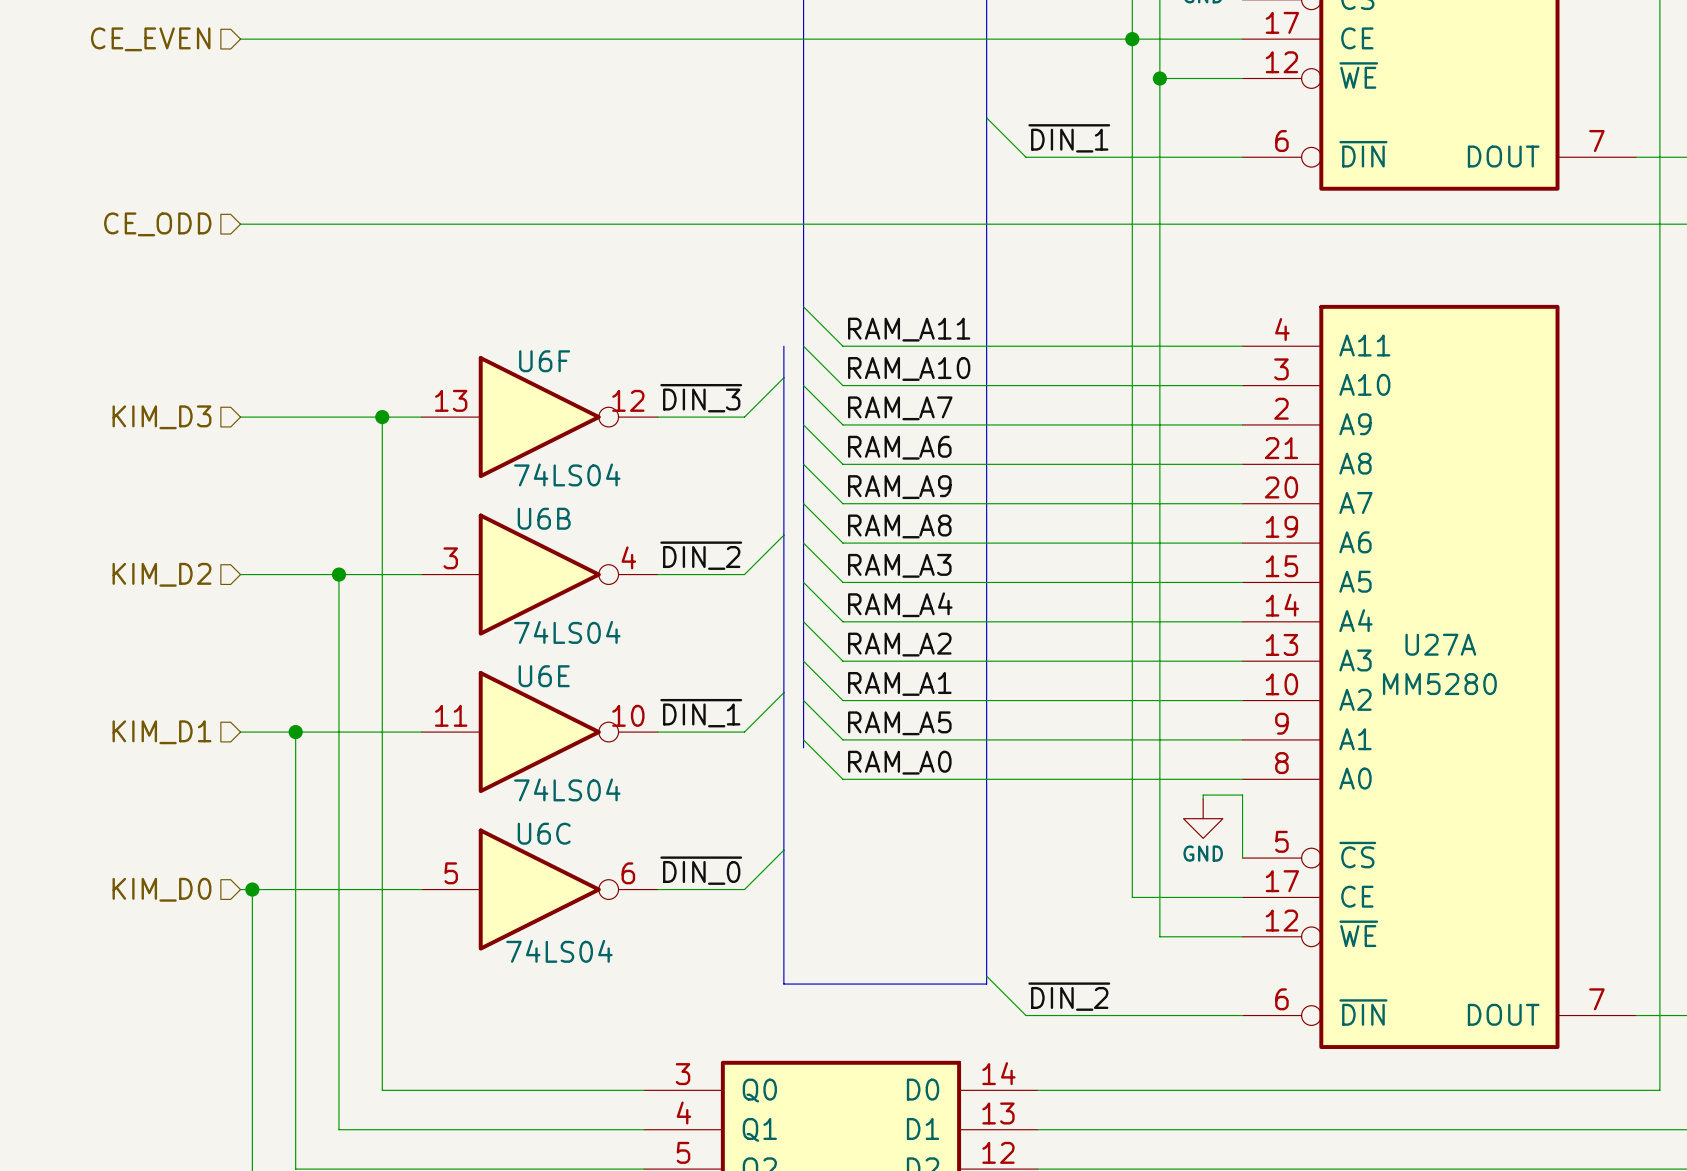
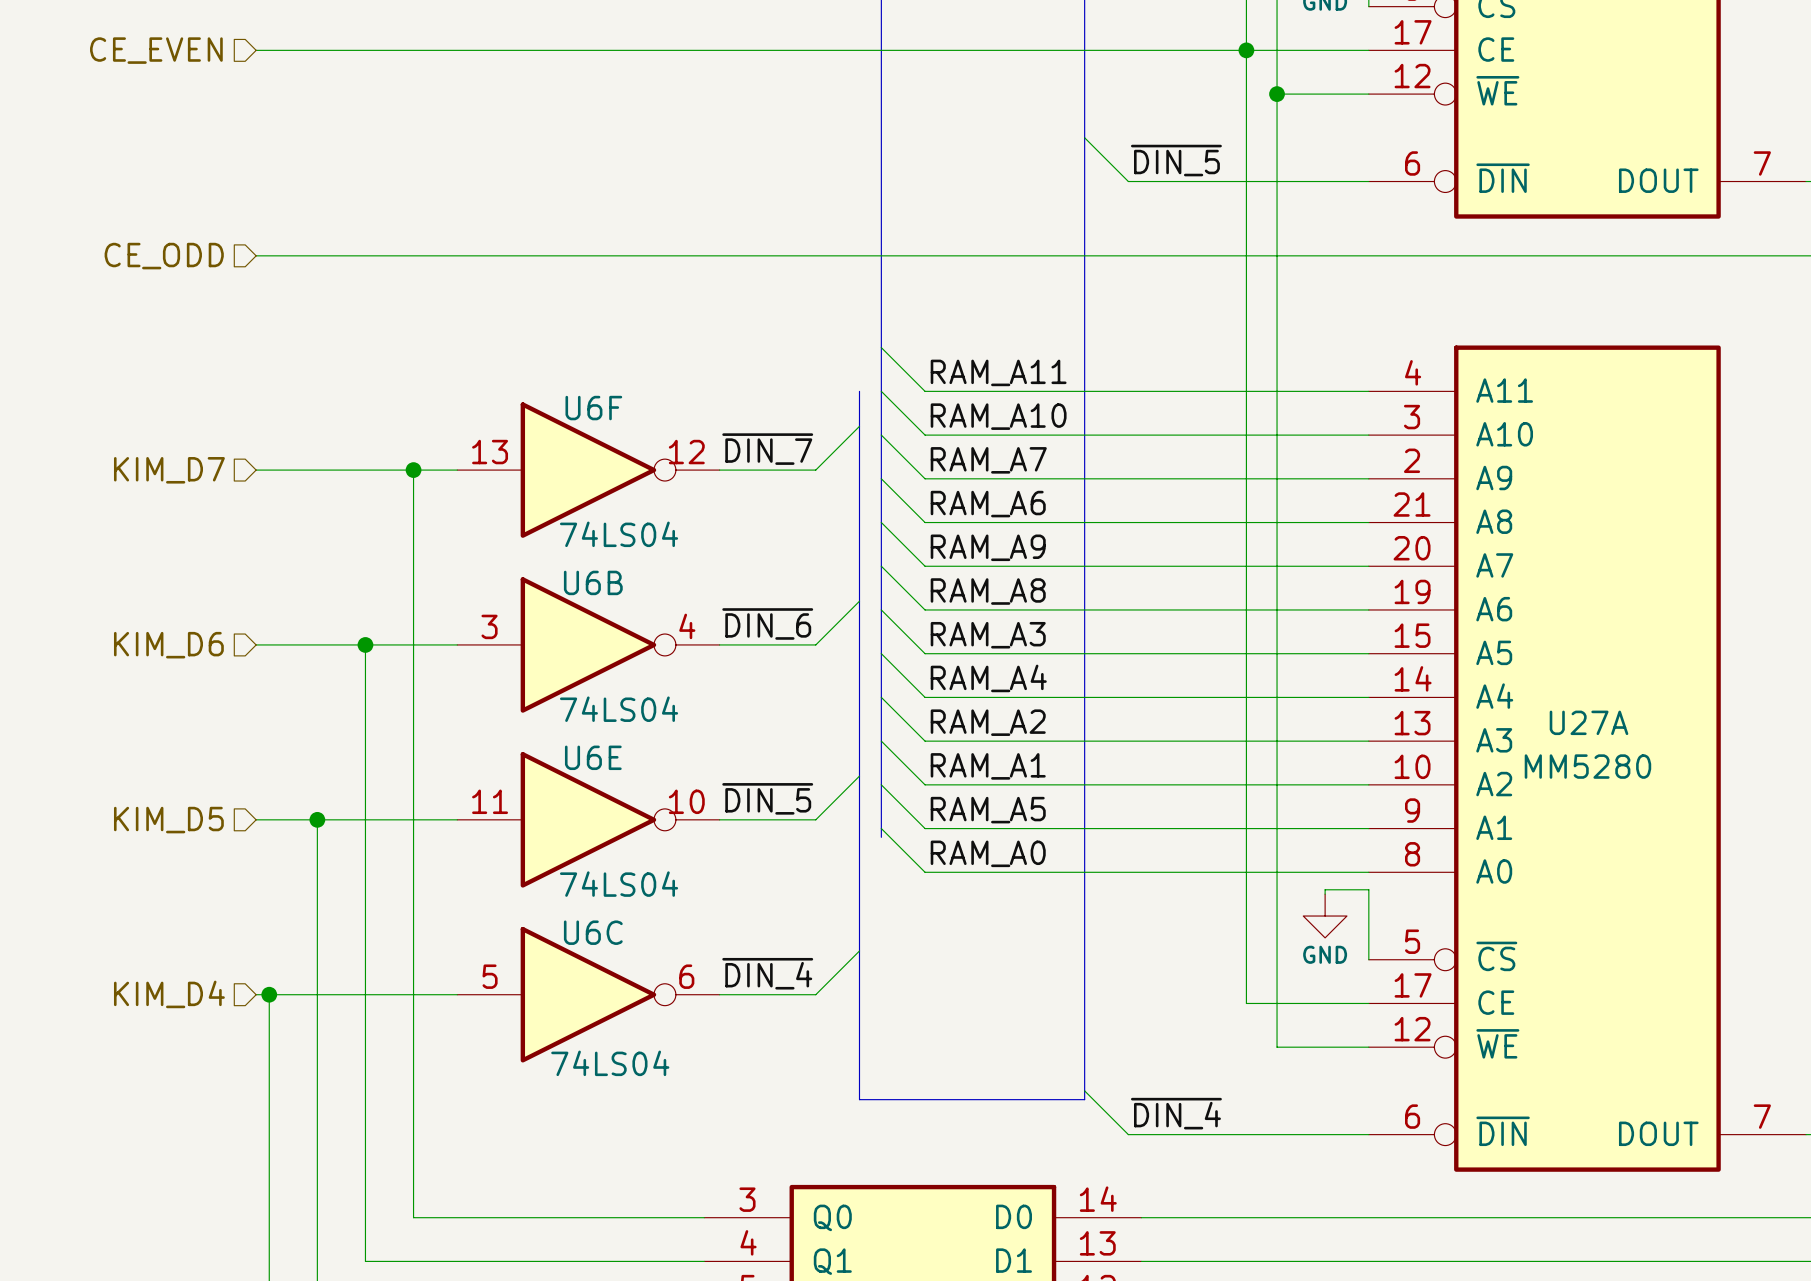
label: ~{DIN_1} (1069, 138) -> ~{DIN_5} (1176, 160)
label: ~{DIN_3} (701, 398) -> ~{DIN_7} (767, 449)
hierarchical label: KIM_D3 (161, 417) -> KIM_D7 (169, 470)
label: ~{DIN_2} (701, 555) -> ~{DIN_6} (767, 623)
hierarchical label: KIM_D2 (161, 574) -> KIM_D6 (168, 645)
label: ~{DIN_1} (701, 713) -> ~{DIN_5} (767, 798)
hierarchical label: KIM_D1 (161, 732) -> KIM_D5 (168, 820)
label: ~{DIN_0} (701, 870) -> ~{DIN_4} (767, 973)
hierarchical label: KIM_D0 (161, 889) -> KIM_D4 (169, 994)
label: ~{DIN_2} (1069, 996) -> ~{DIN_4} (1176, 1113)

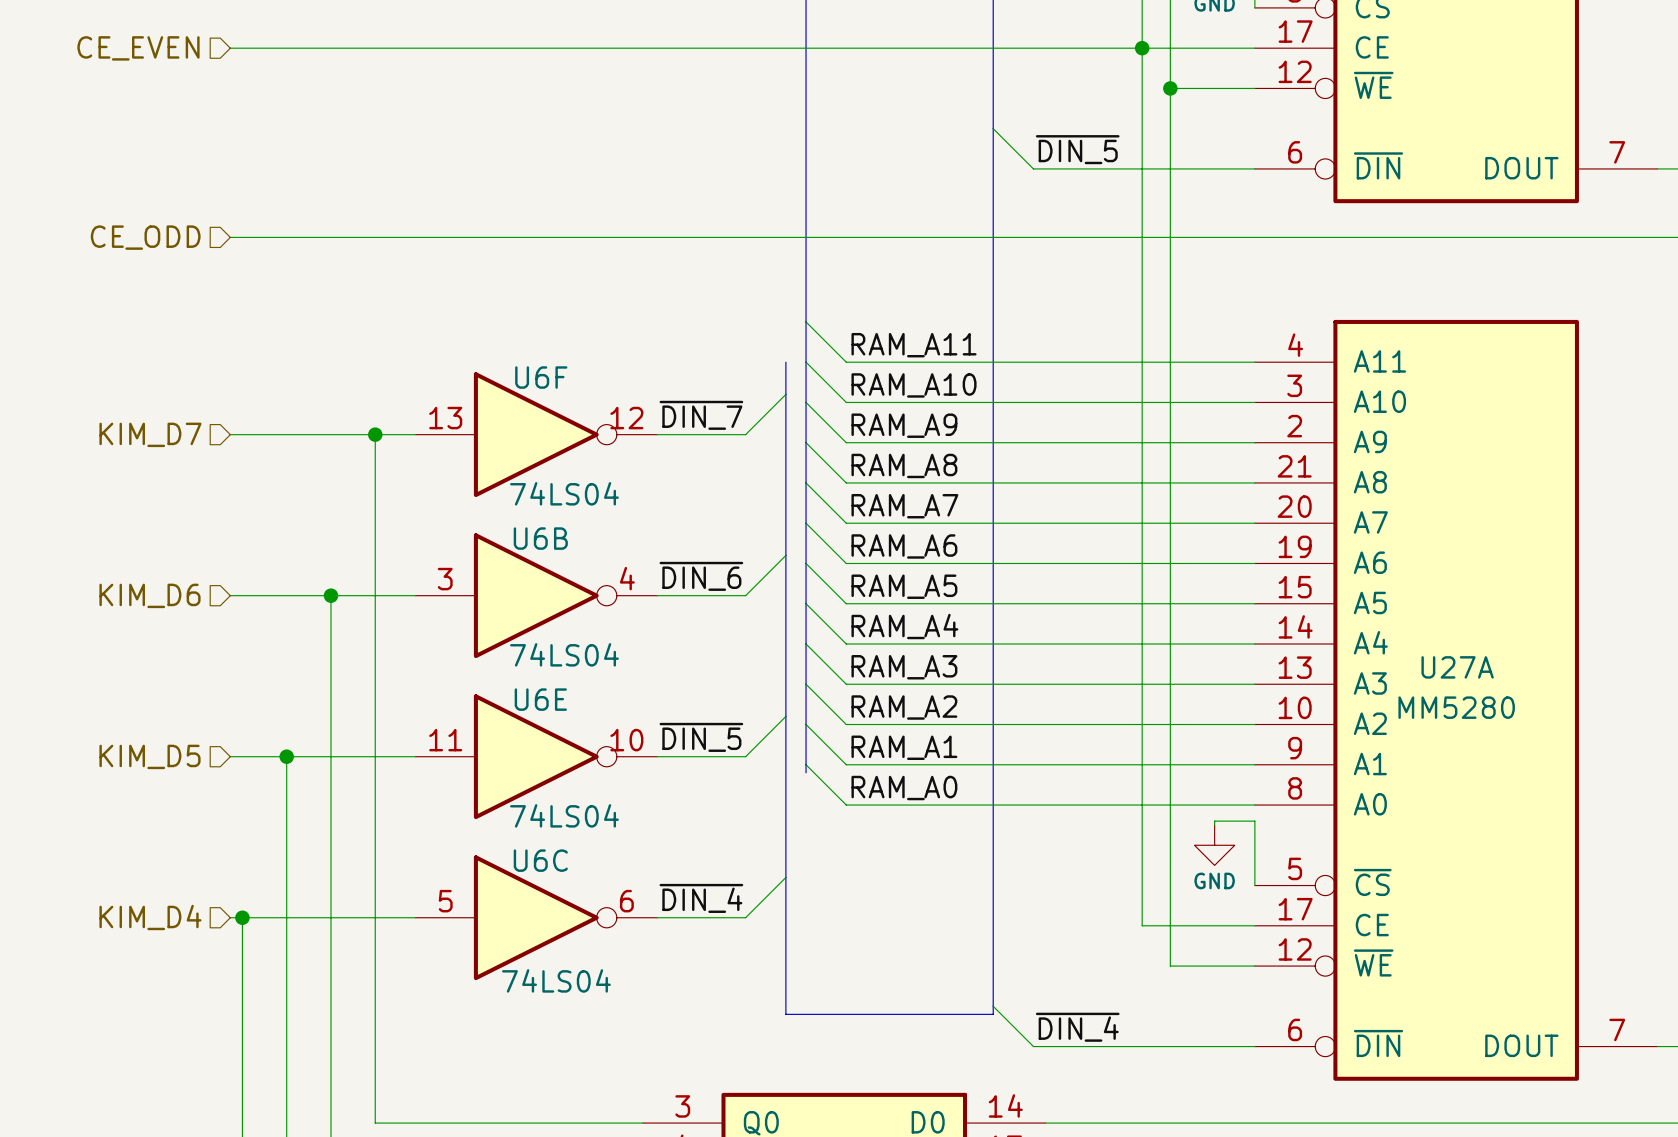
label: RAM_A7 (988, 460) -> RAM_A9 (904, 425)
label: RAM_A6 (988, 504) -> RAM_A8 (904, 465)
label: RAM_A9 (988, 547) -> RAM_A7 (904, 506)
label: RAM_A8 (988, 591) -> RAM_A6 (904, 546)
label: RAM_A3 (988, 635) -> RAM_A5 (904, 586)
label: RAM_A2 (988, 722) -> RAM_A3 (904, 667)
label: RAM_A1 (988, 766) -> RAM_A2 (904, 707)
label: RAM_A5 (988, 810) -> RAM_A1 (904, 747)

